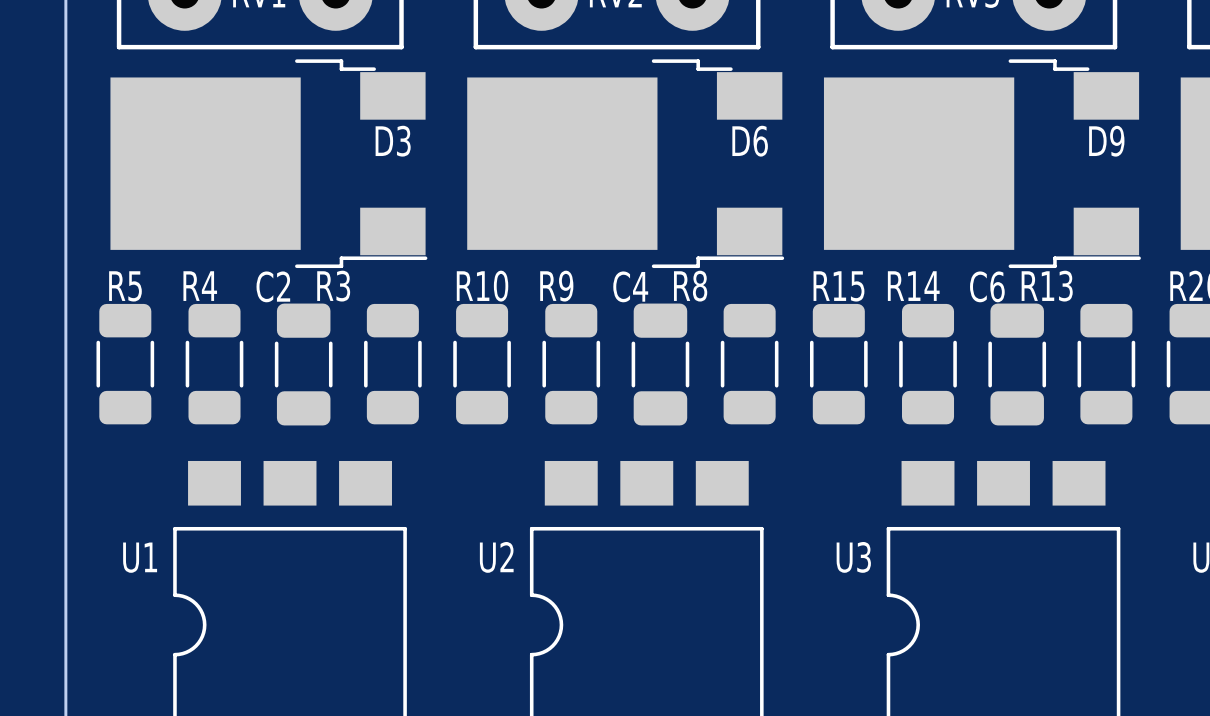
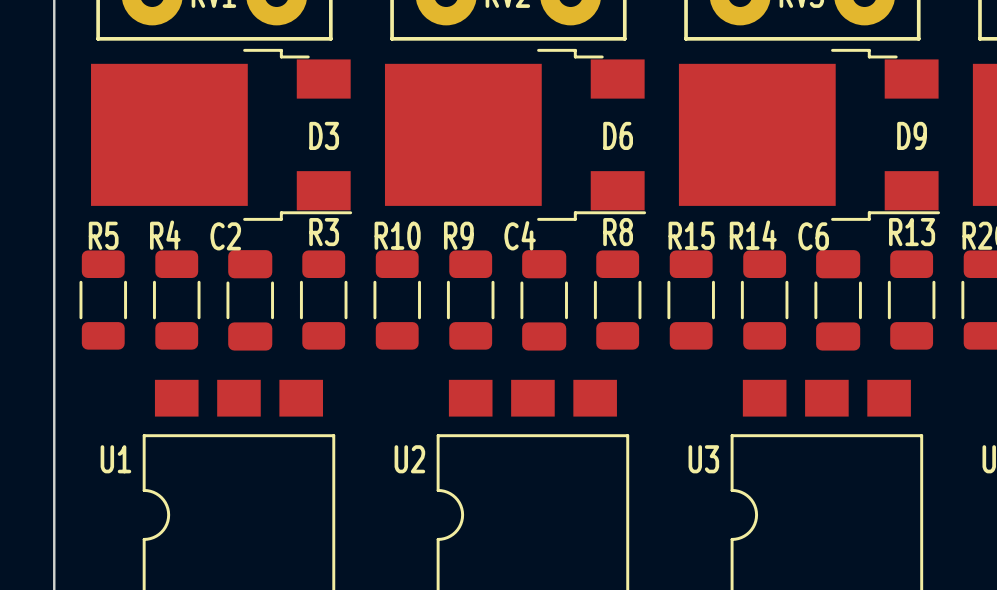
D3 name position: D3 (393, 141) -> D3 (324, 135)
D6 name position: D6 (750, 141) -> D6 (618, 135)
D9 name position: D9 (1106, 141) -> D9 (912, 135)
R3 name position: R3 (333, 286) -> R3 (324, 232)
R8 name position: R8 (690, 286) -> R8 (618, 232)
R13 name position: R13 (1047, 286) -> R13 (912, 232)

